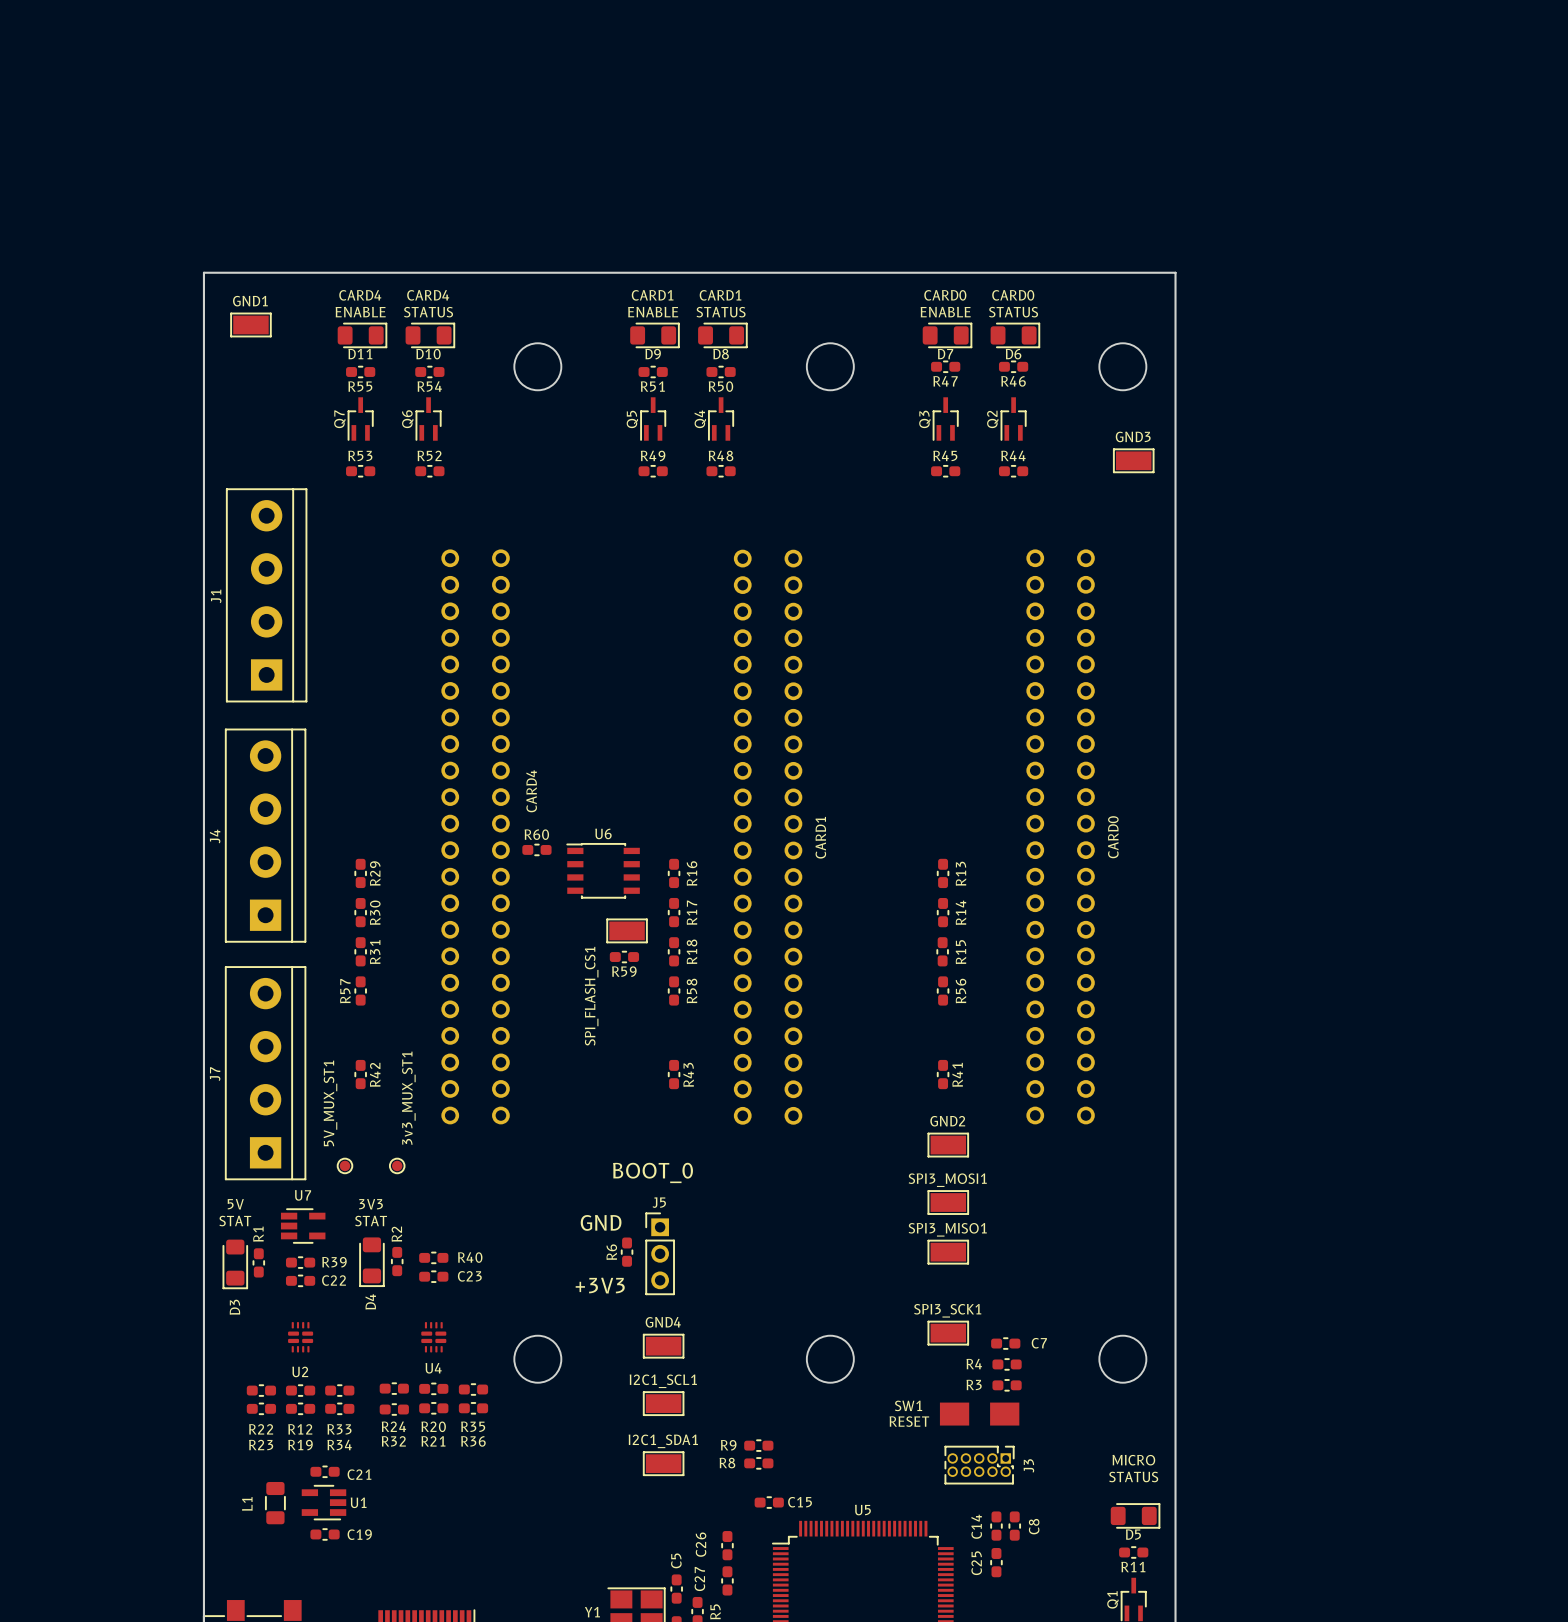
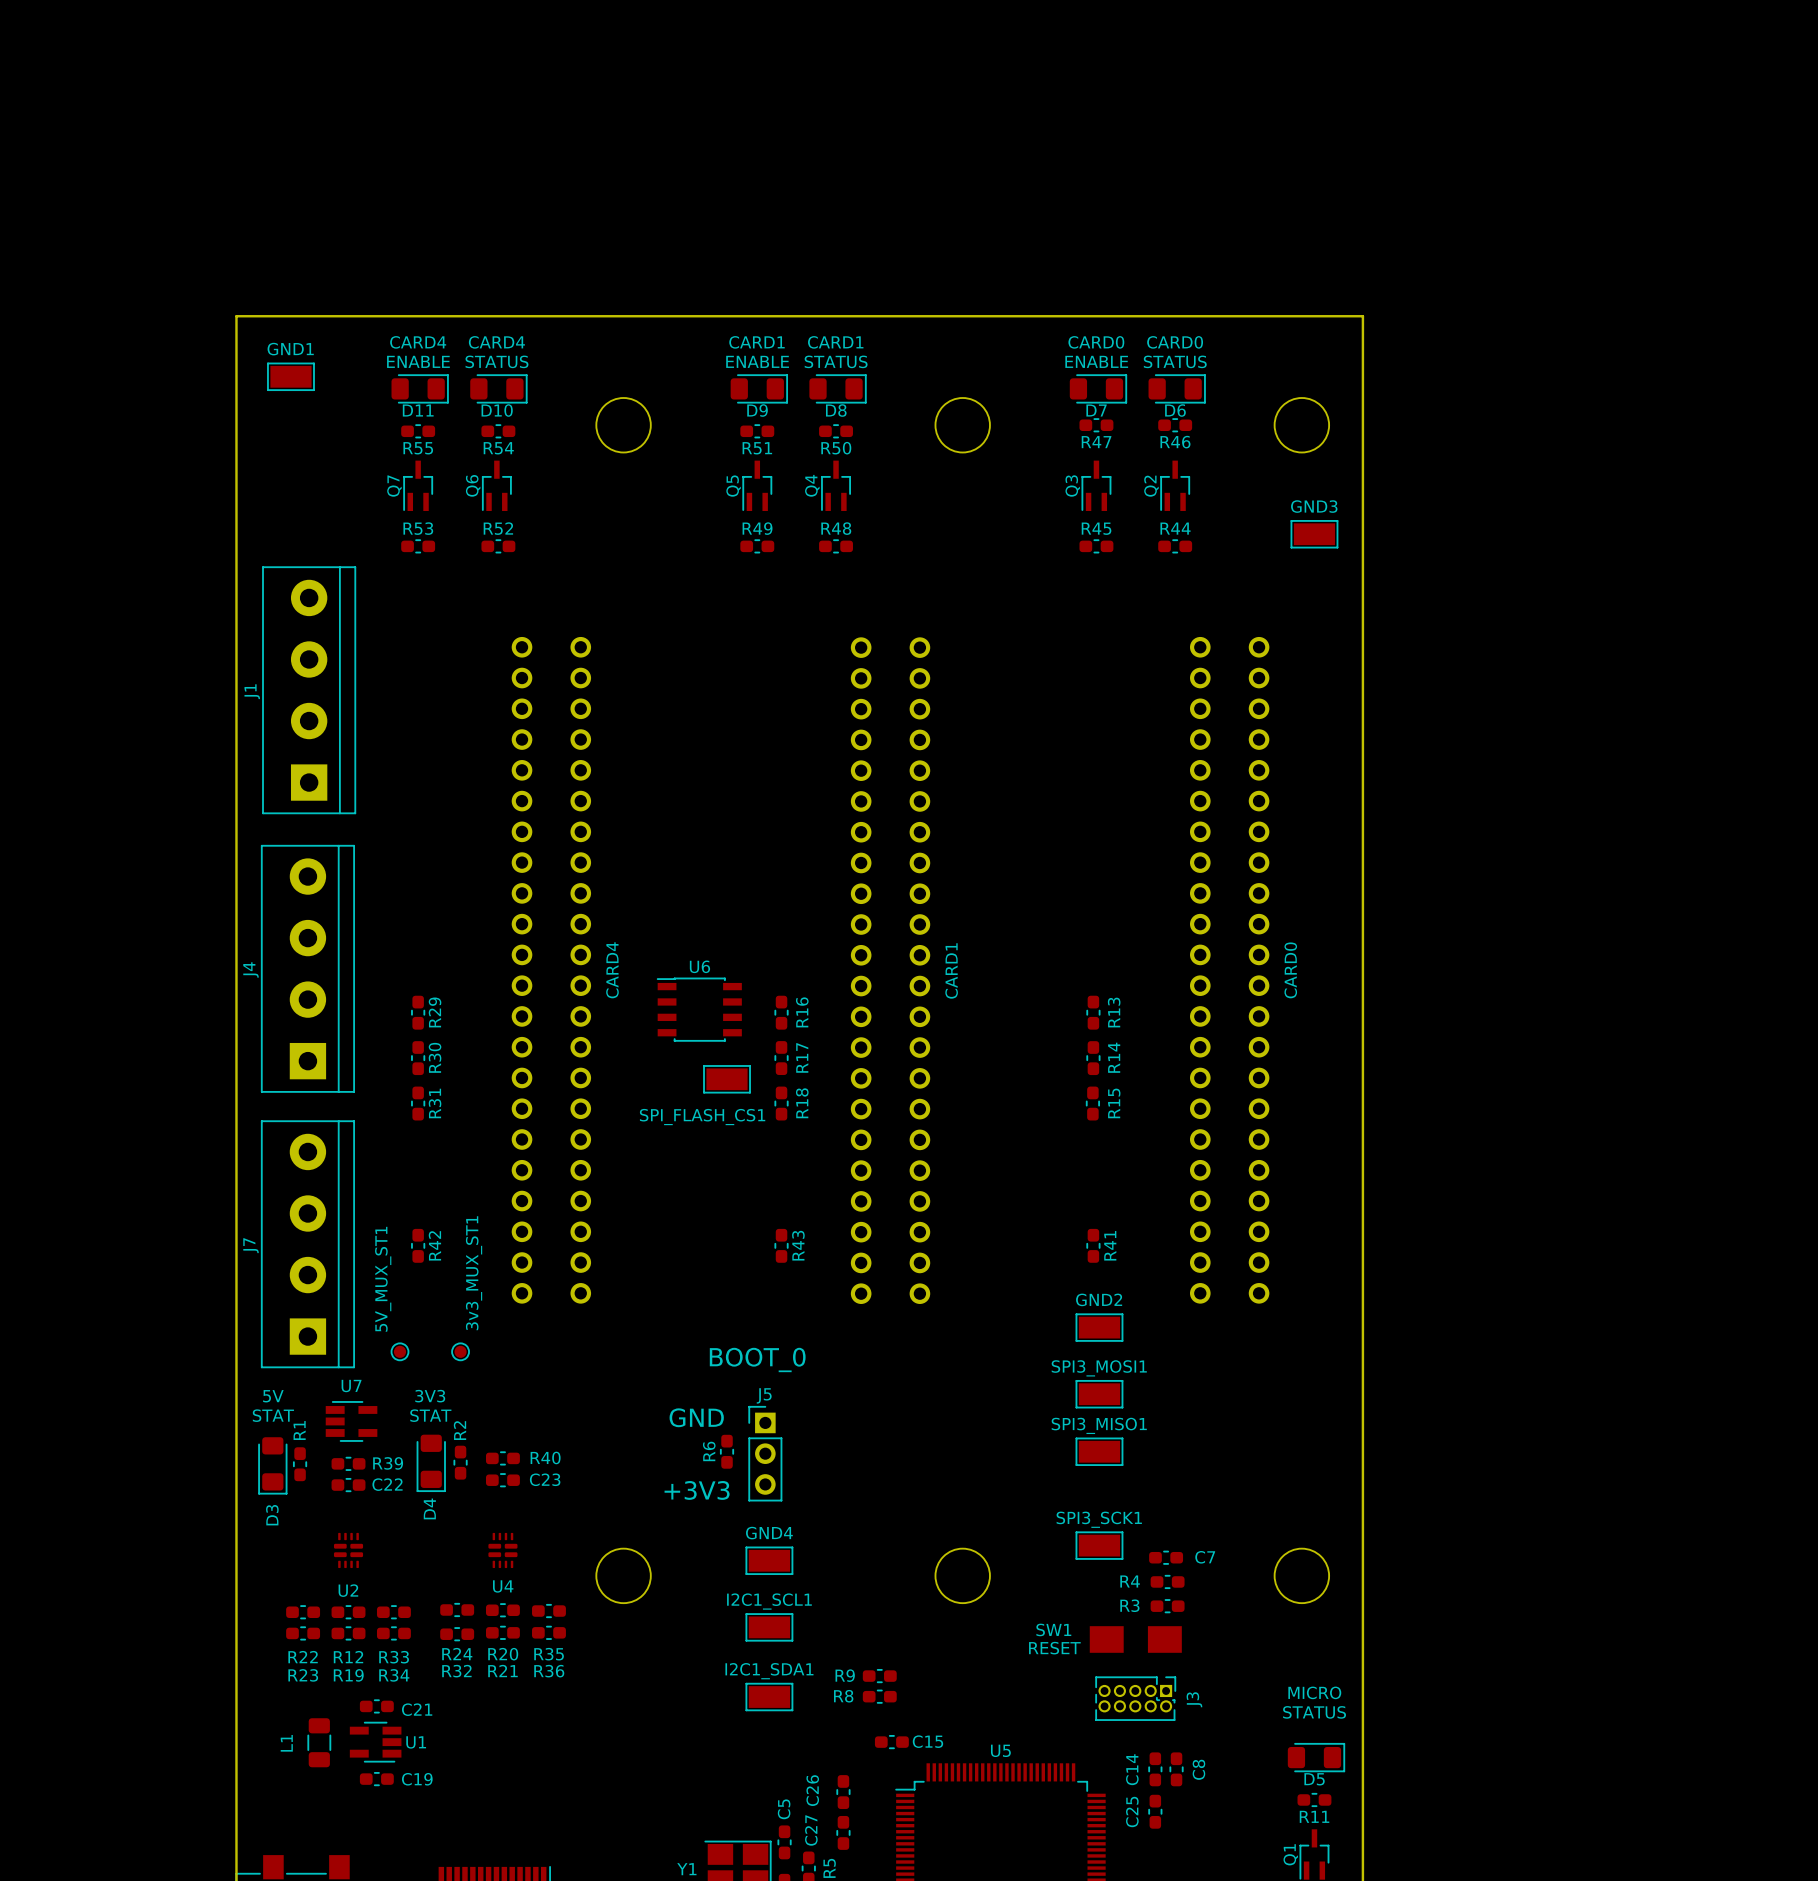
CARD4 name position: CARD4 (531, 791) -> CARD4 (612, 970)
R60: (536, 849) -> none
R59: (624, 957) -> none
R57: (360, 990) -> none
R58: (674, 990) -> none
R56: (943, 990) -> none
SPI_FLASH_CS1 name rotation: 0° (591, 996) -> 90° clockwise (702, 1117)

